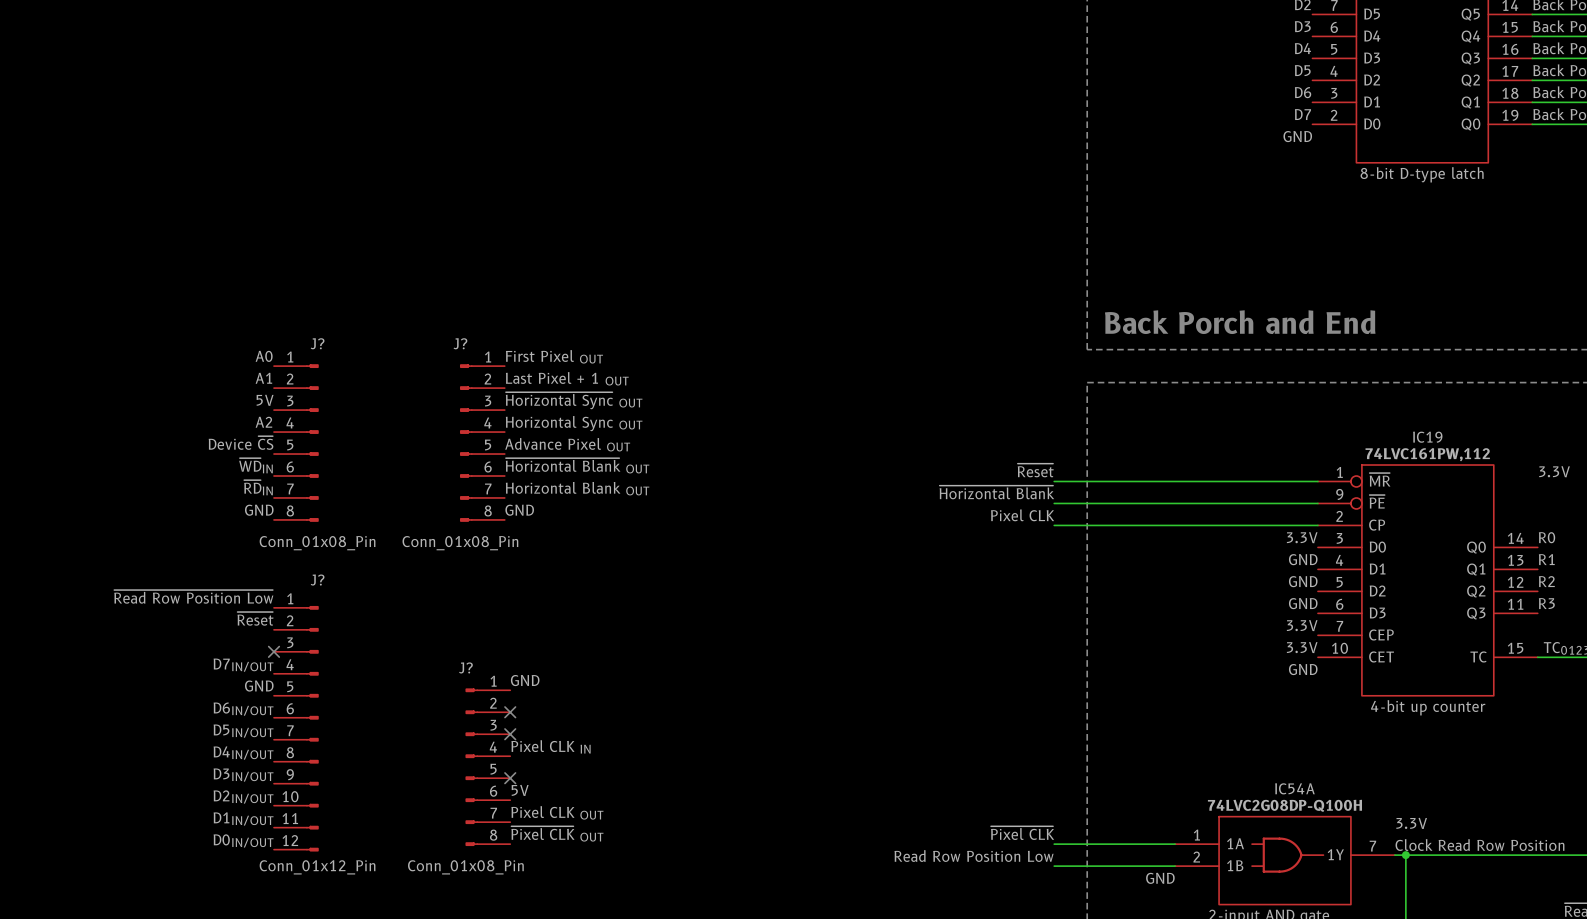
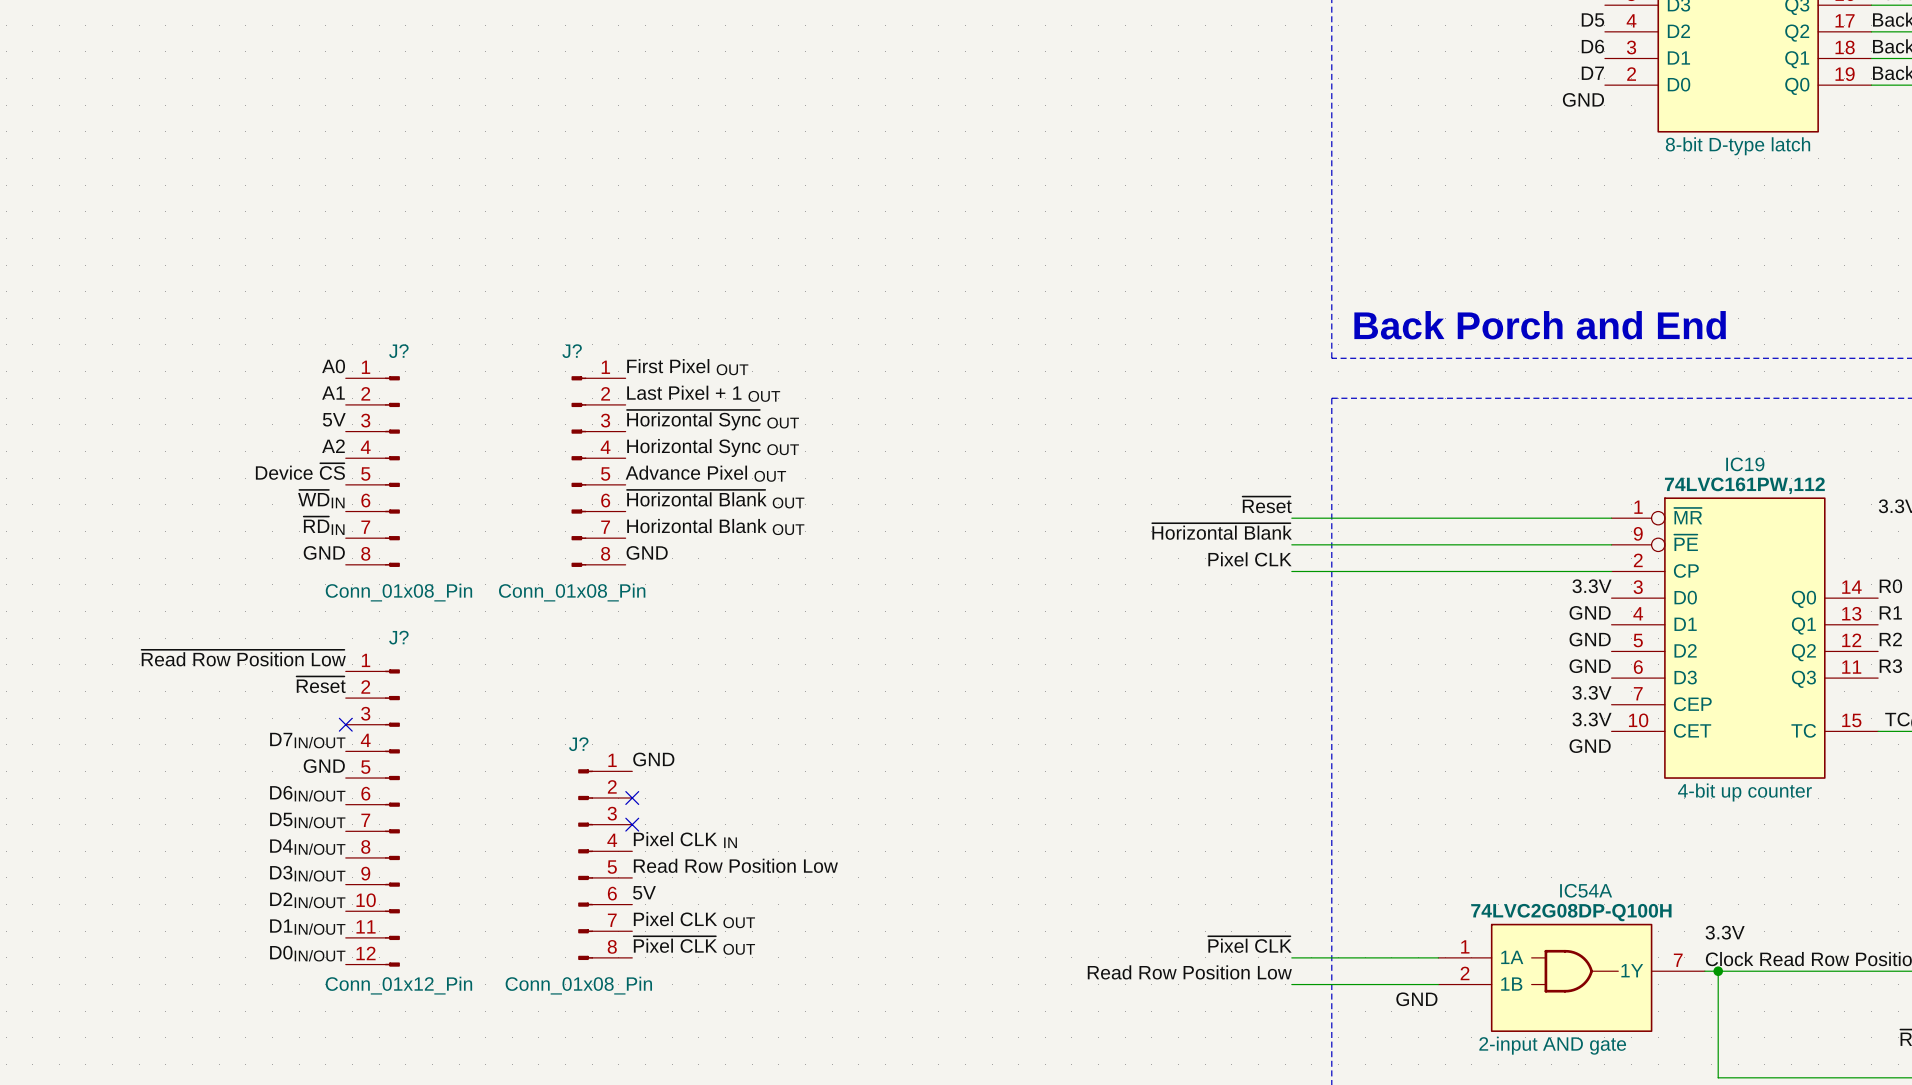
label: none -> Read Row Position Low (735, 865)
no-connect mark: (510, 778) -> none

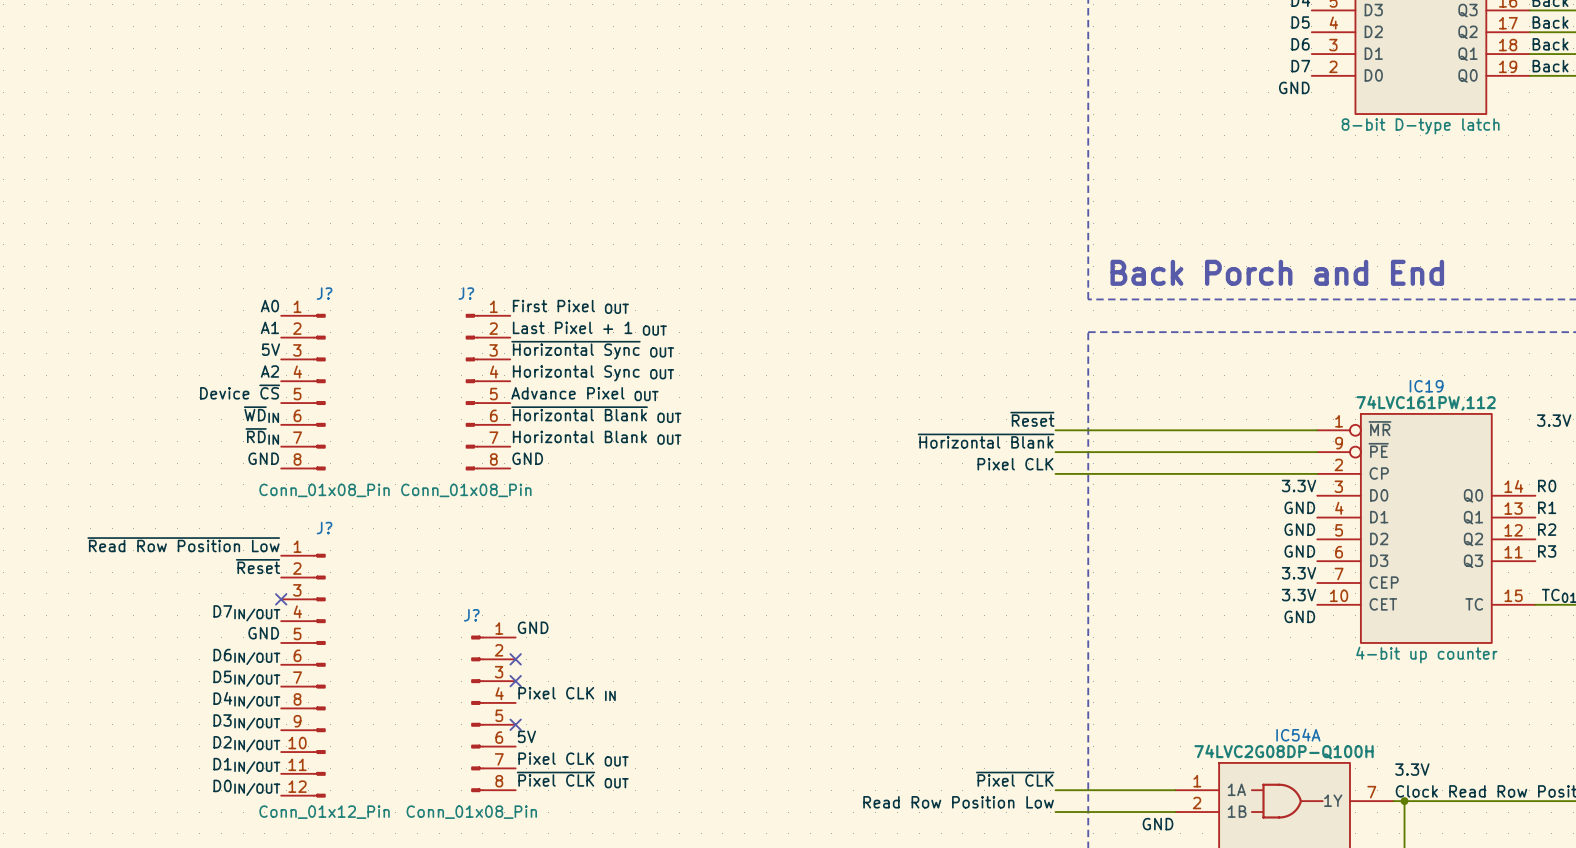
label: Read Row Position Low (735, 865) -> none
no-connect mark: none -> (515, 724)

